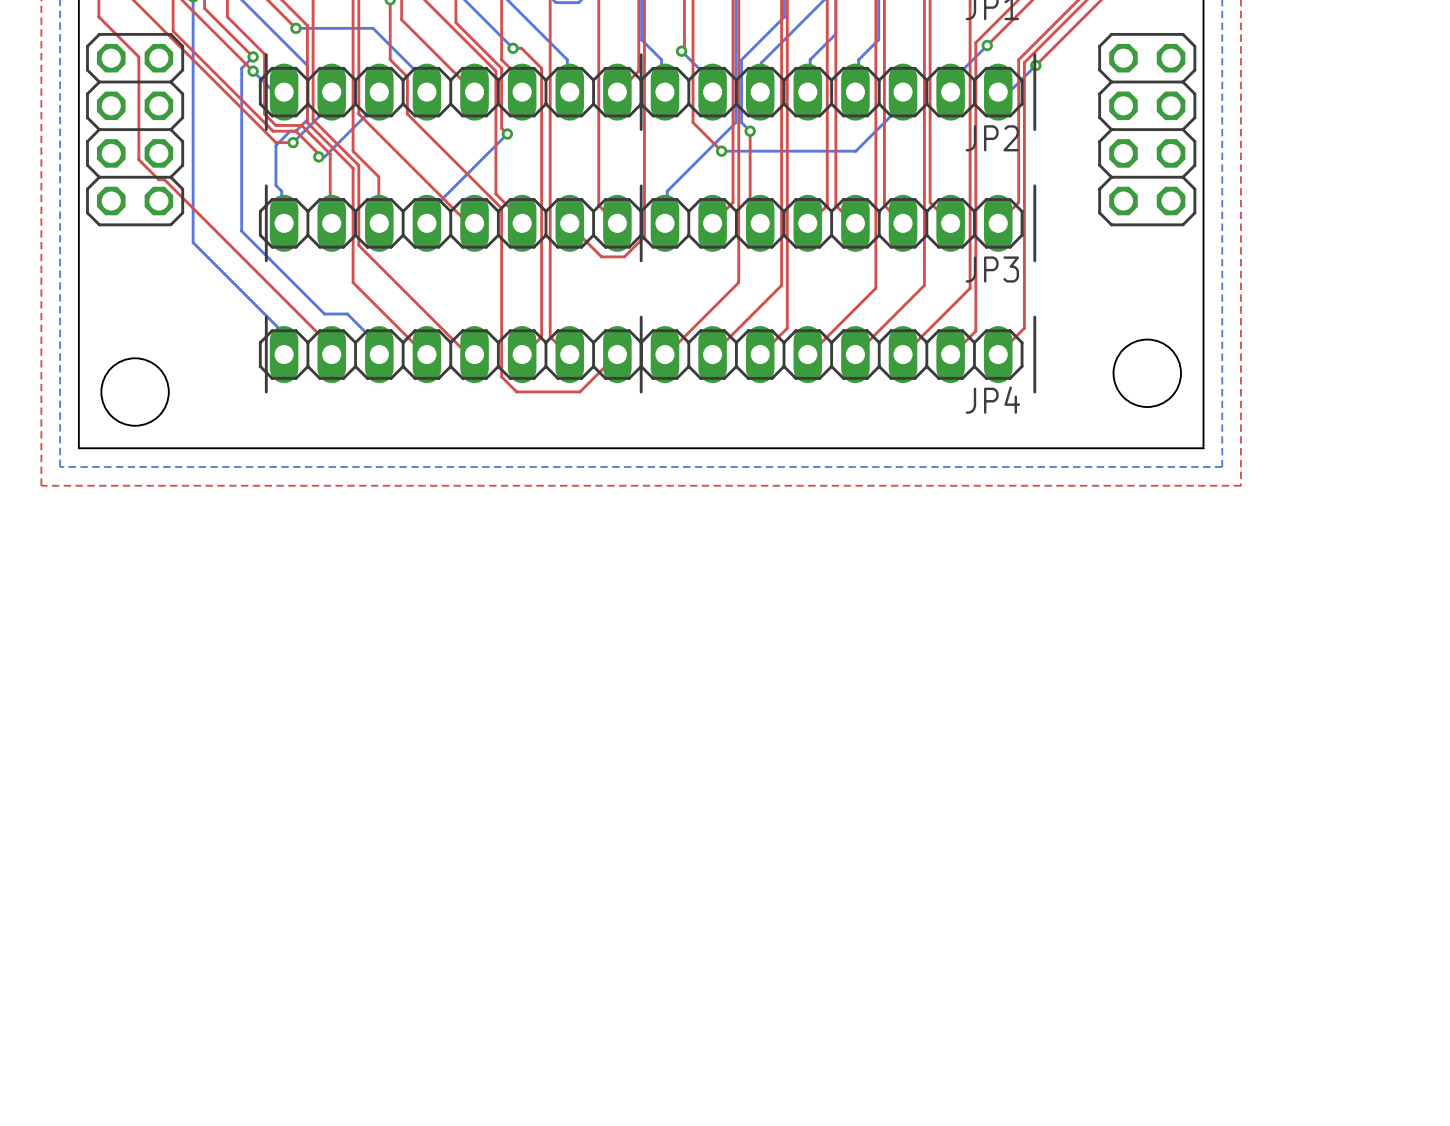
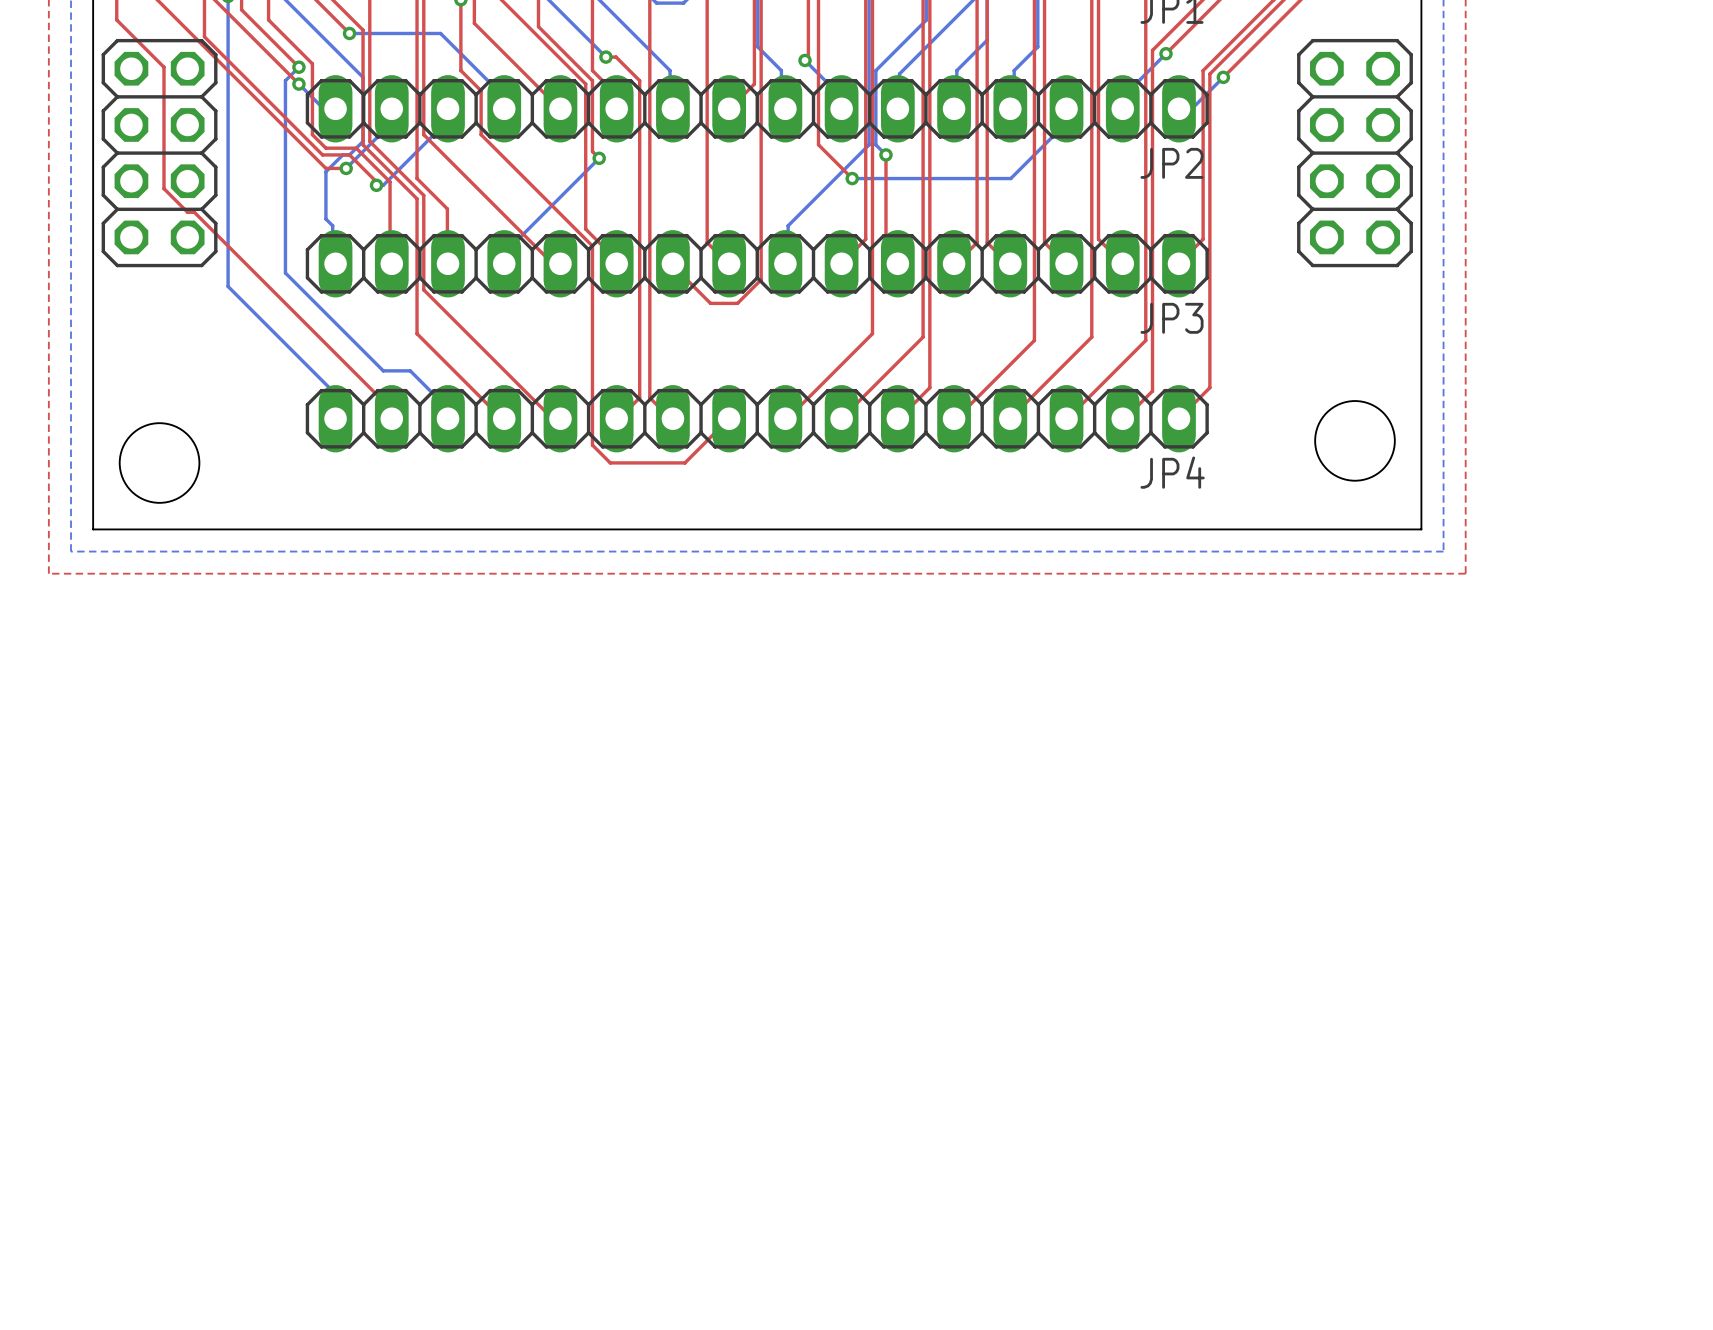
line: (266, 54) (266, 129) -> none
line: (641, 54) (641, 129) -> none
line: (1034, 54) (1034, 129) -> none
line: (266, 185) (266, 260) -> none
line: (641, 185) (641, 260) -> none
line: (1034, 185) (1034, 260) -> none
line: (266, 317) (266, 392) -> none
line: (641, 317) (641, 392) -> none
line: (1034, 317) (1034, 392) -> none

